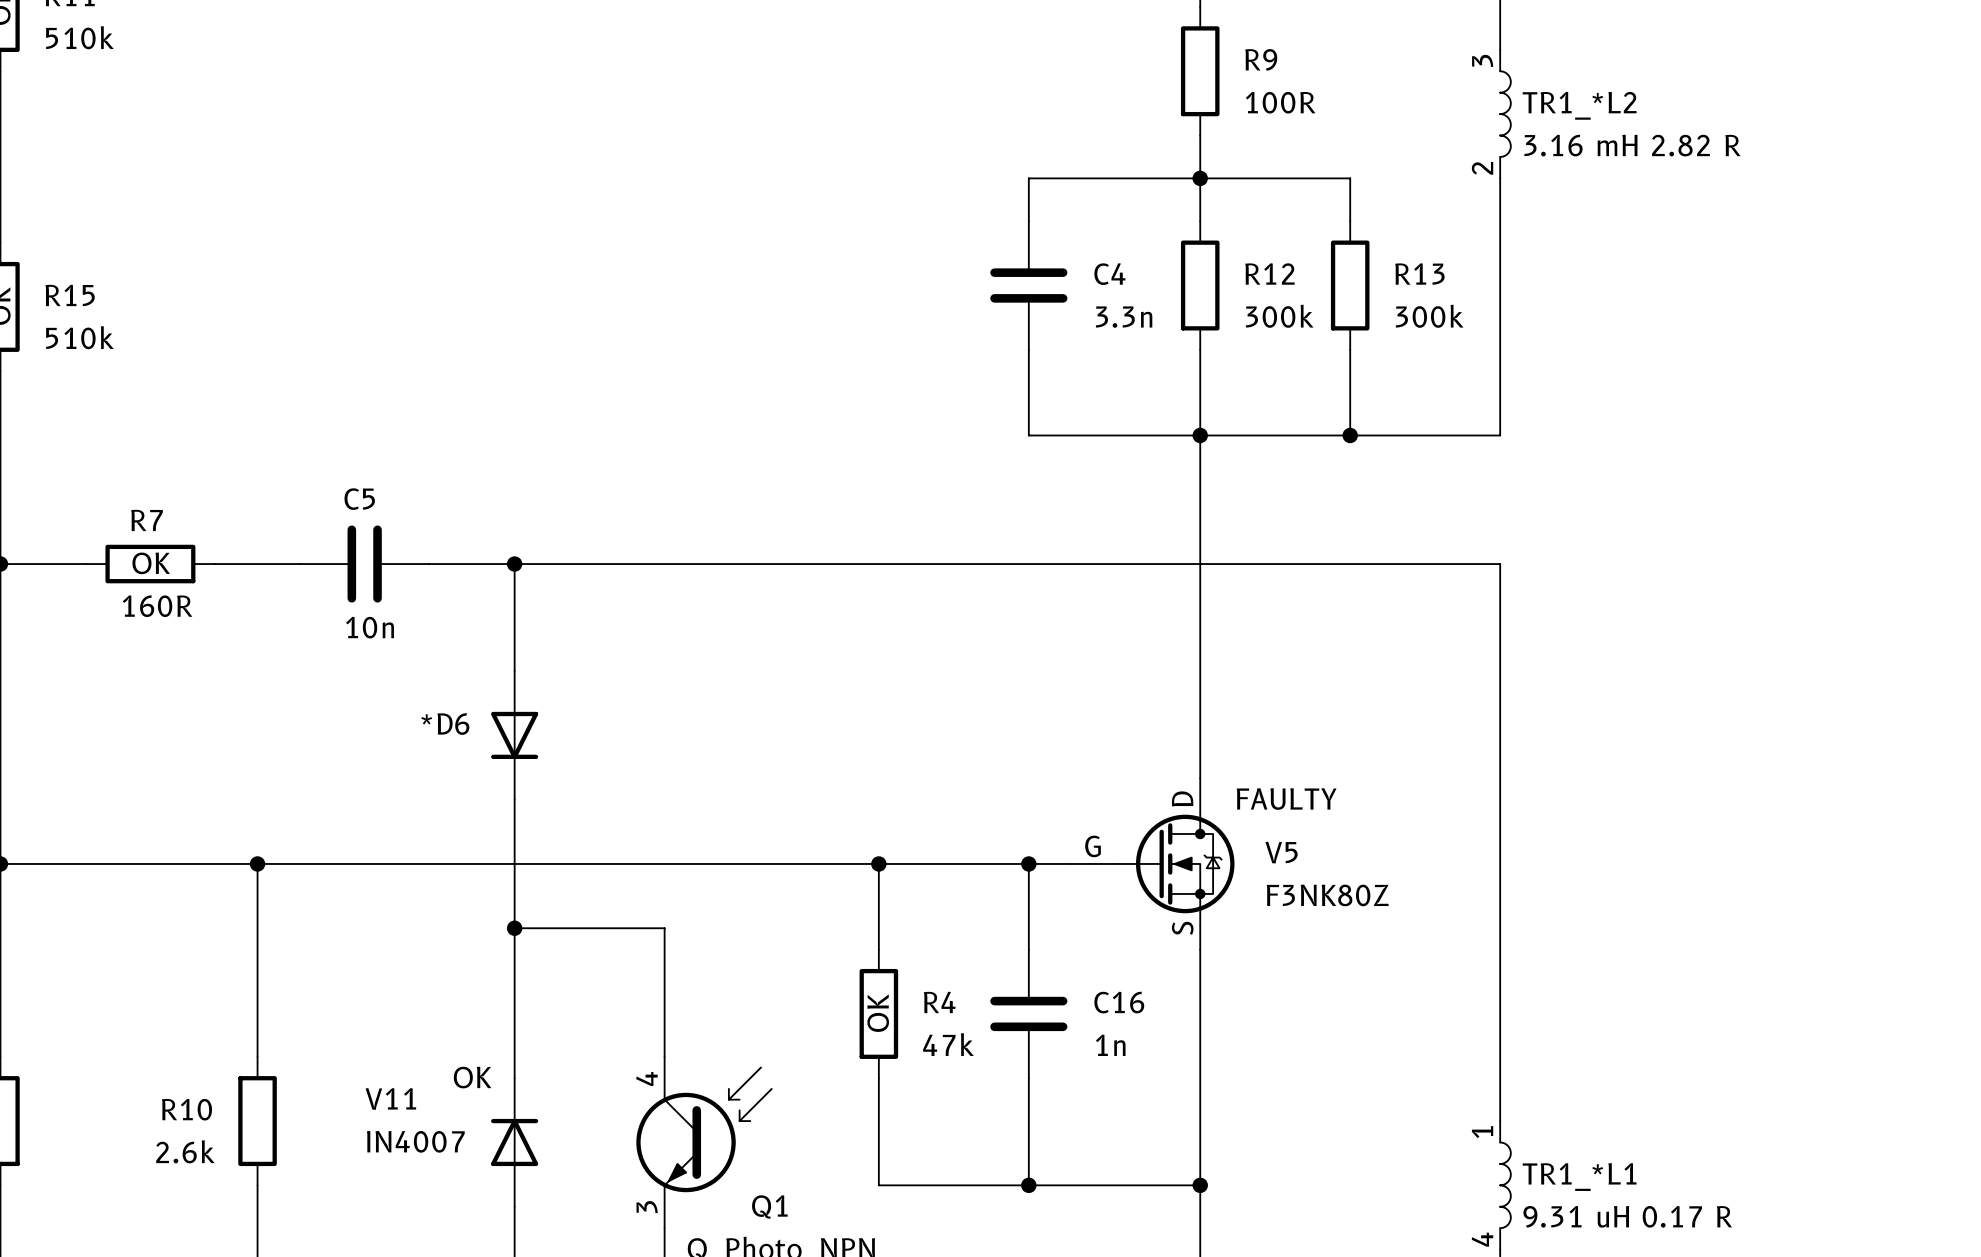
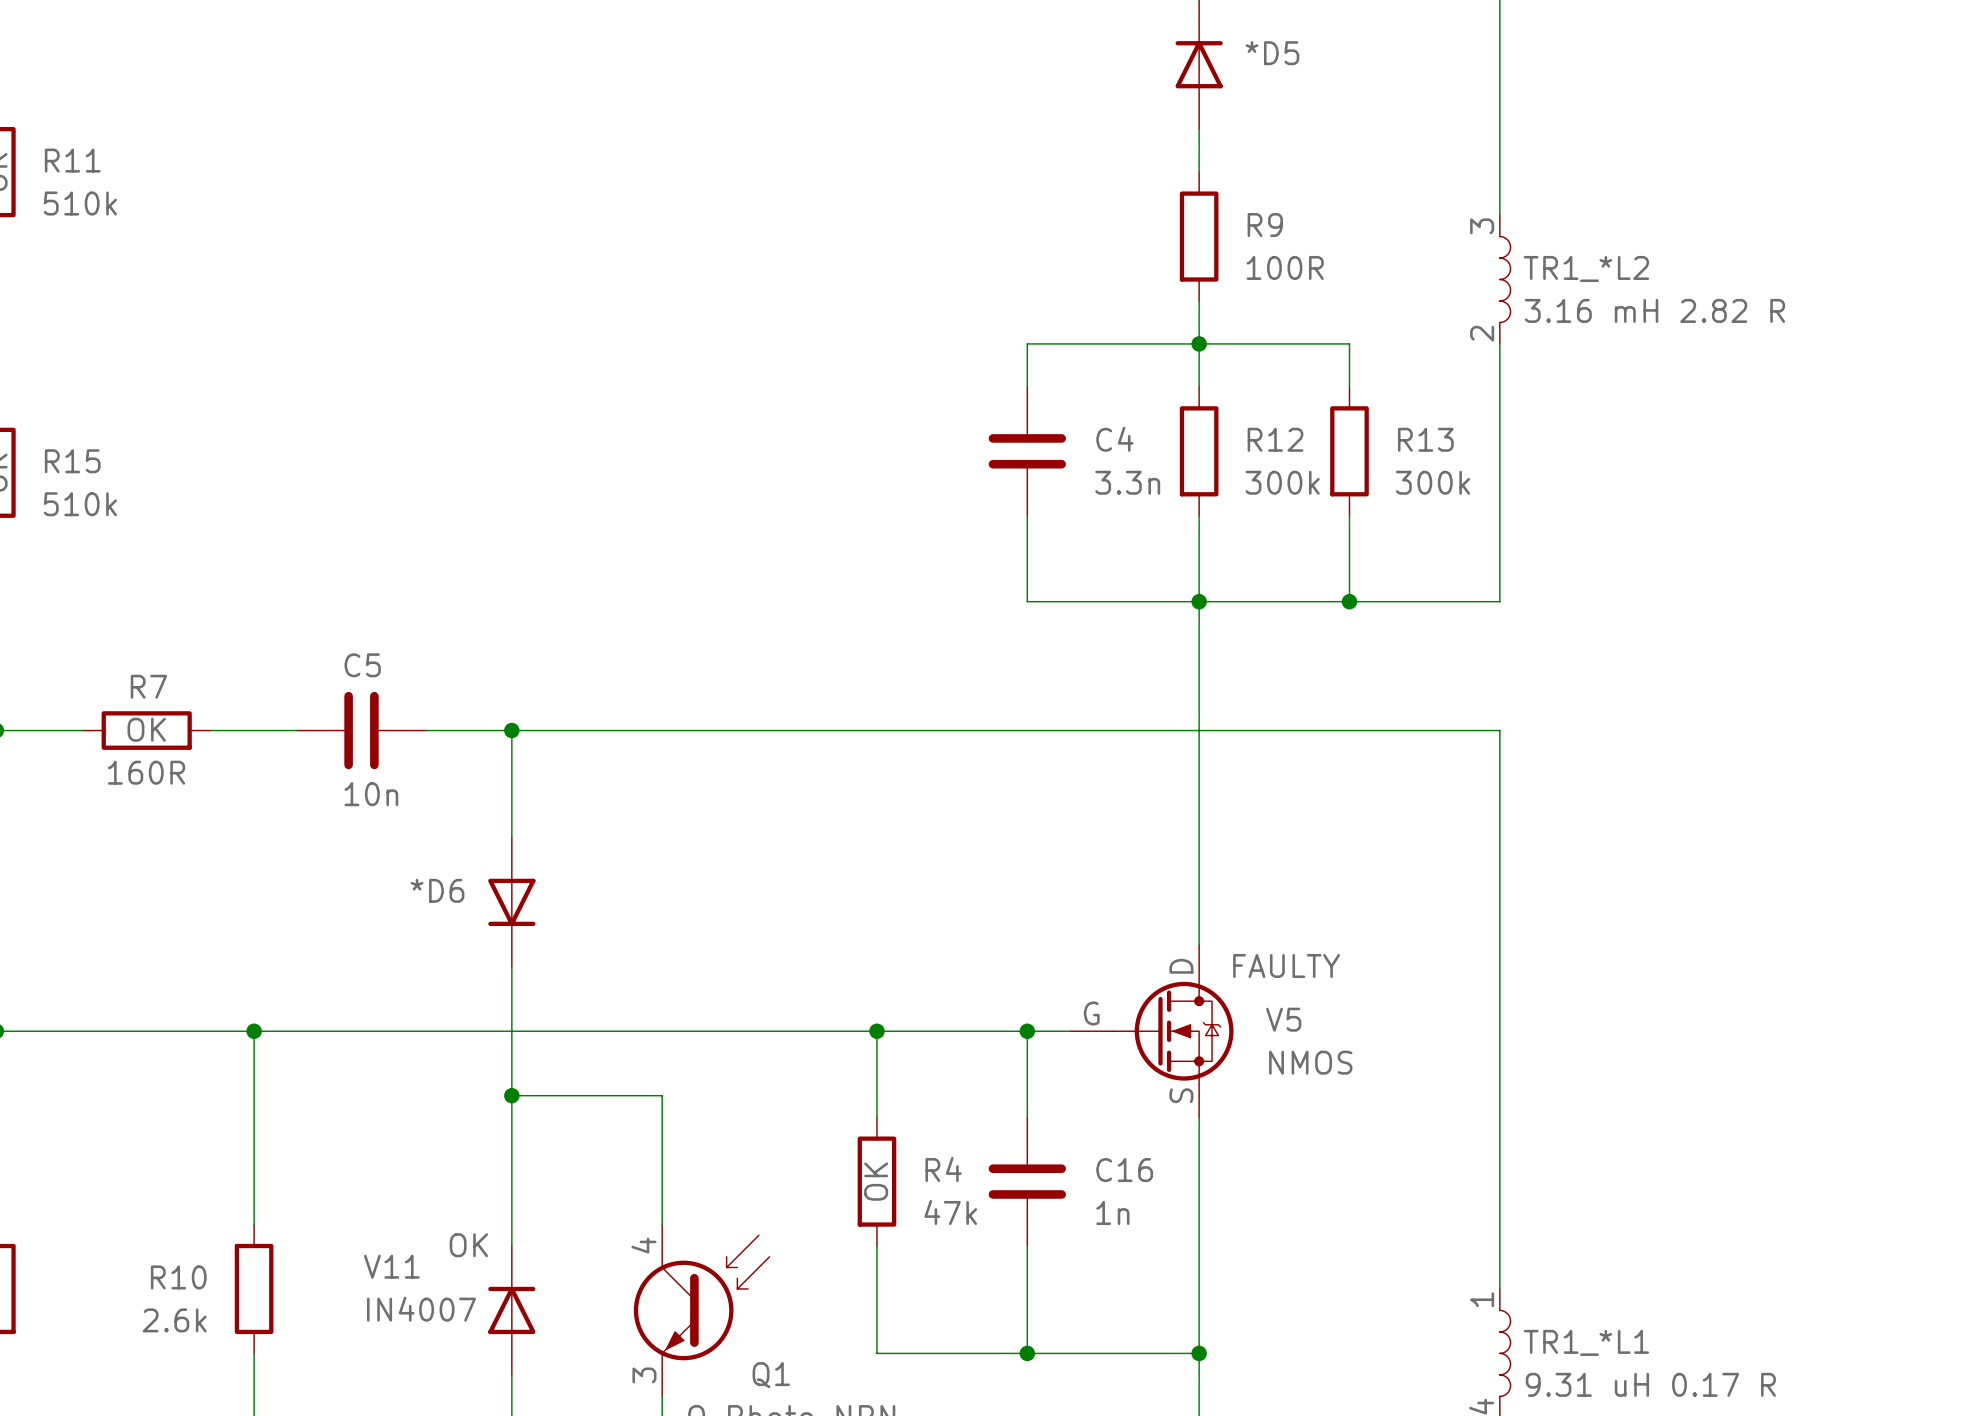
V5 value: F3NK80Z (1327, 895) -> NMOS (1310, 1062)

